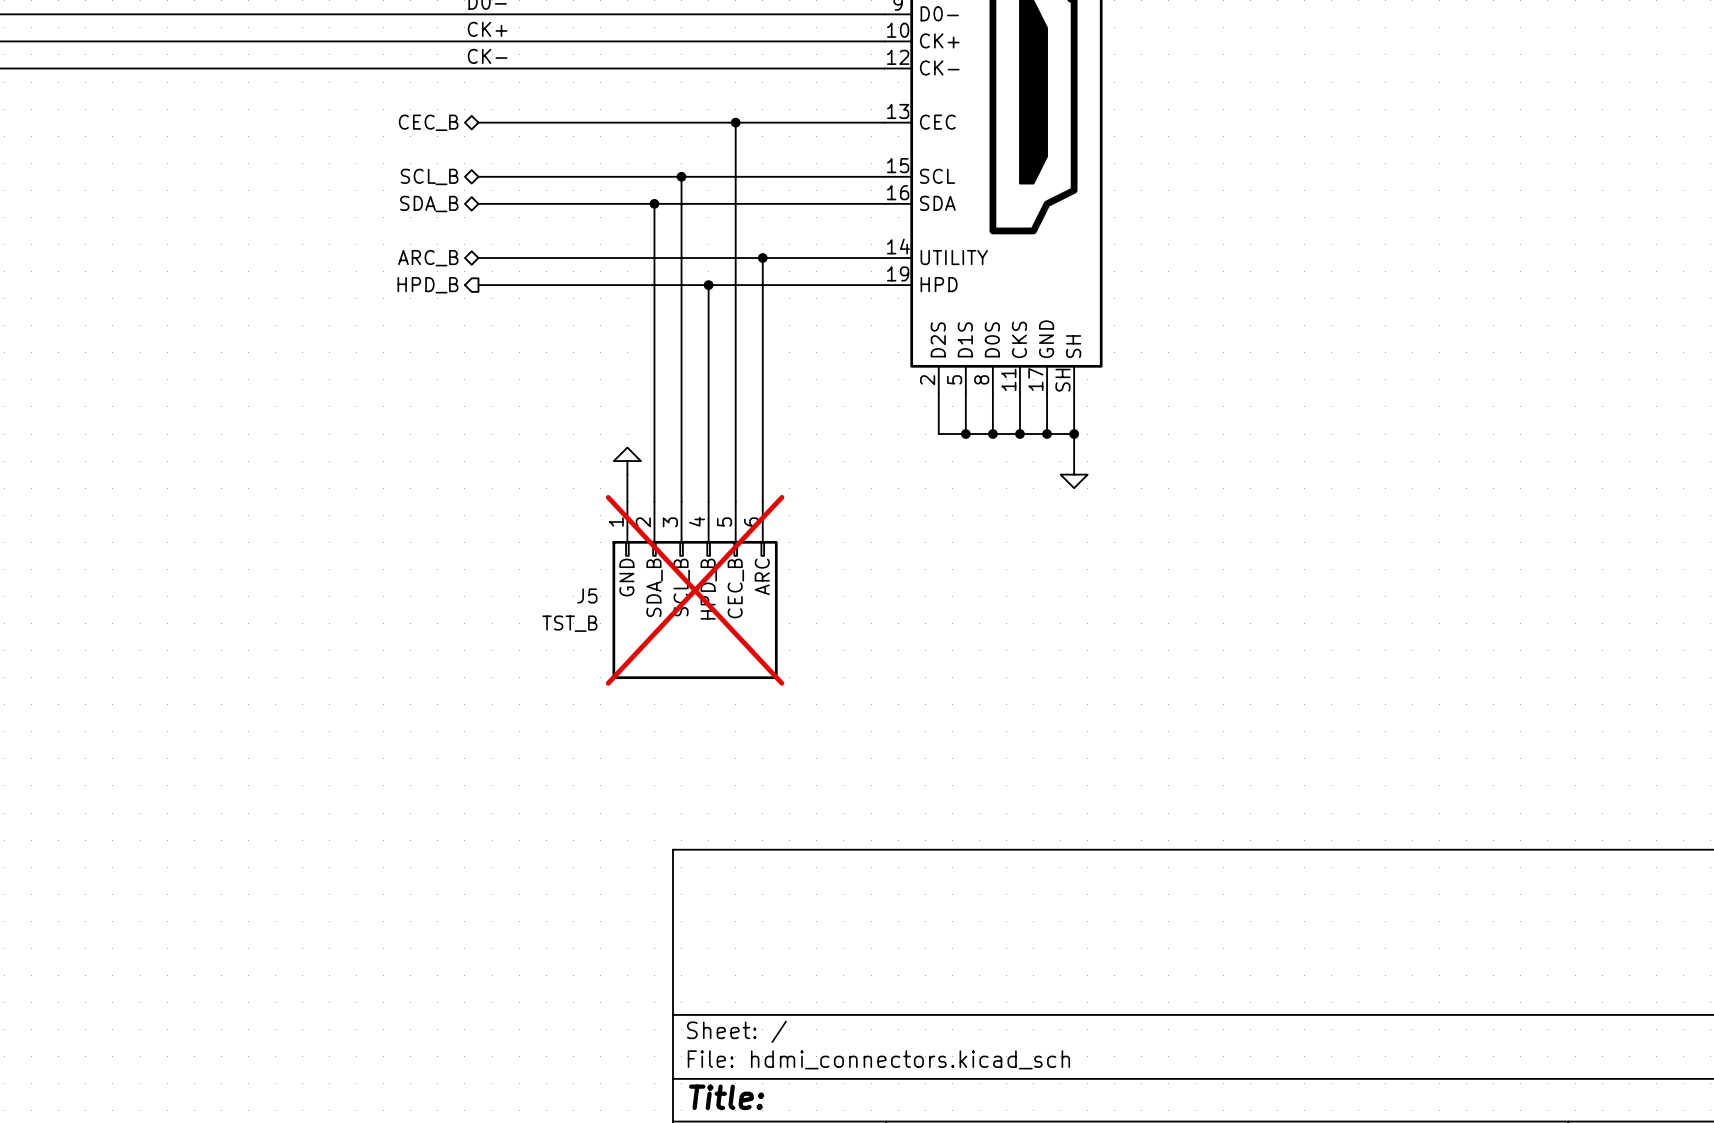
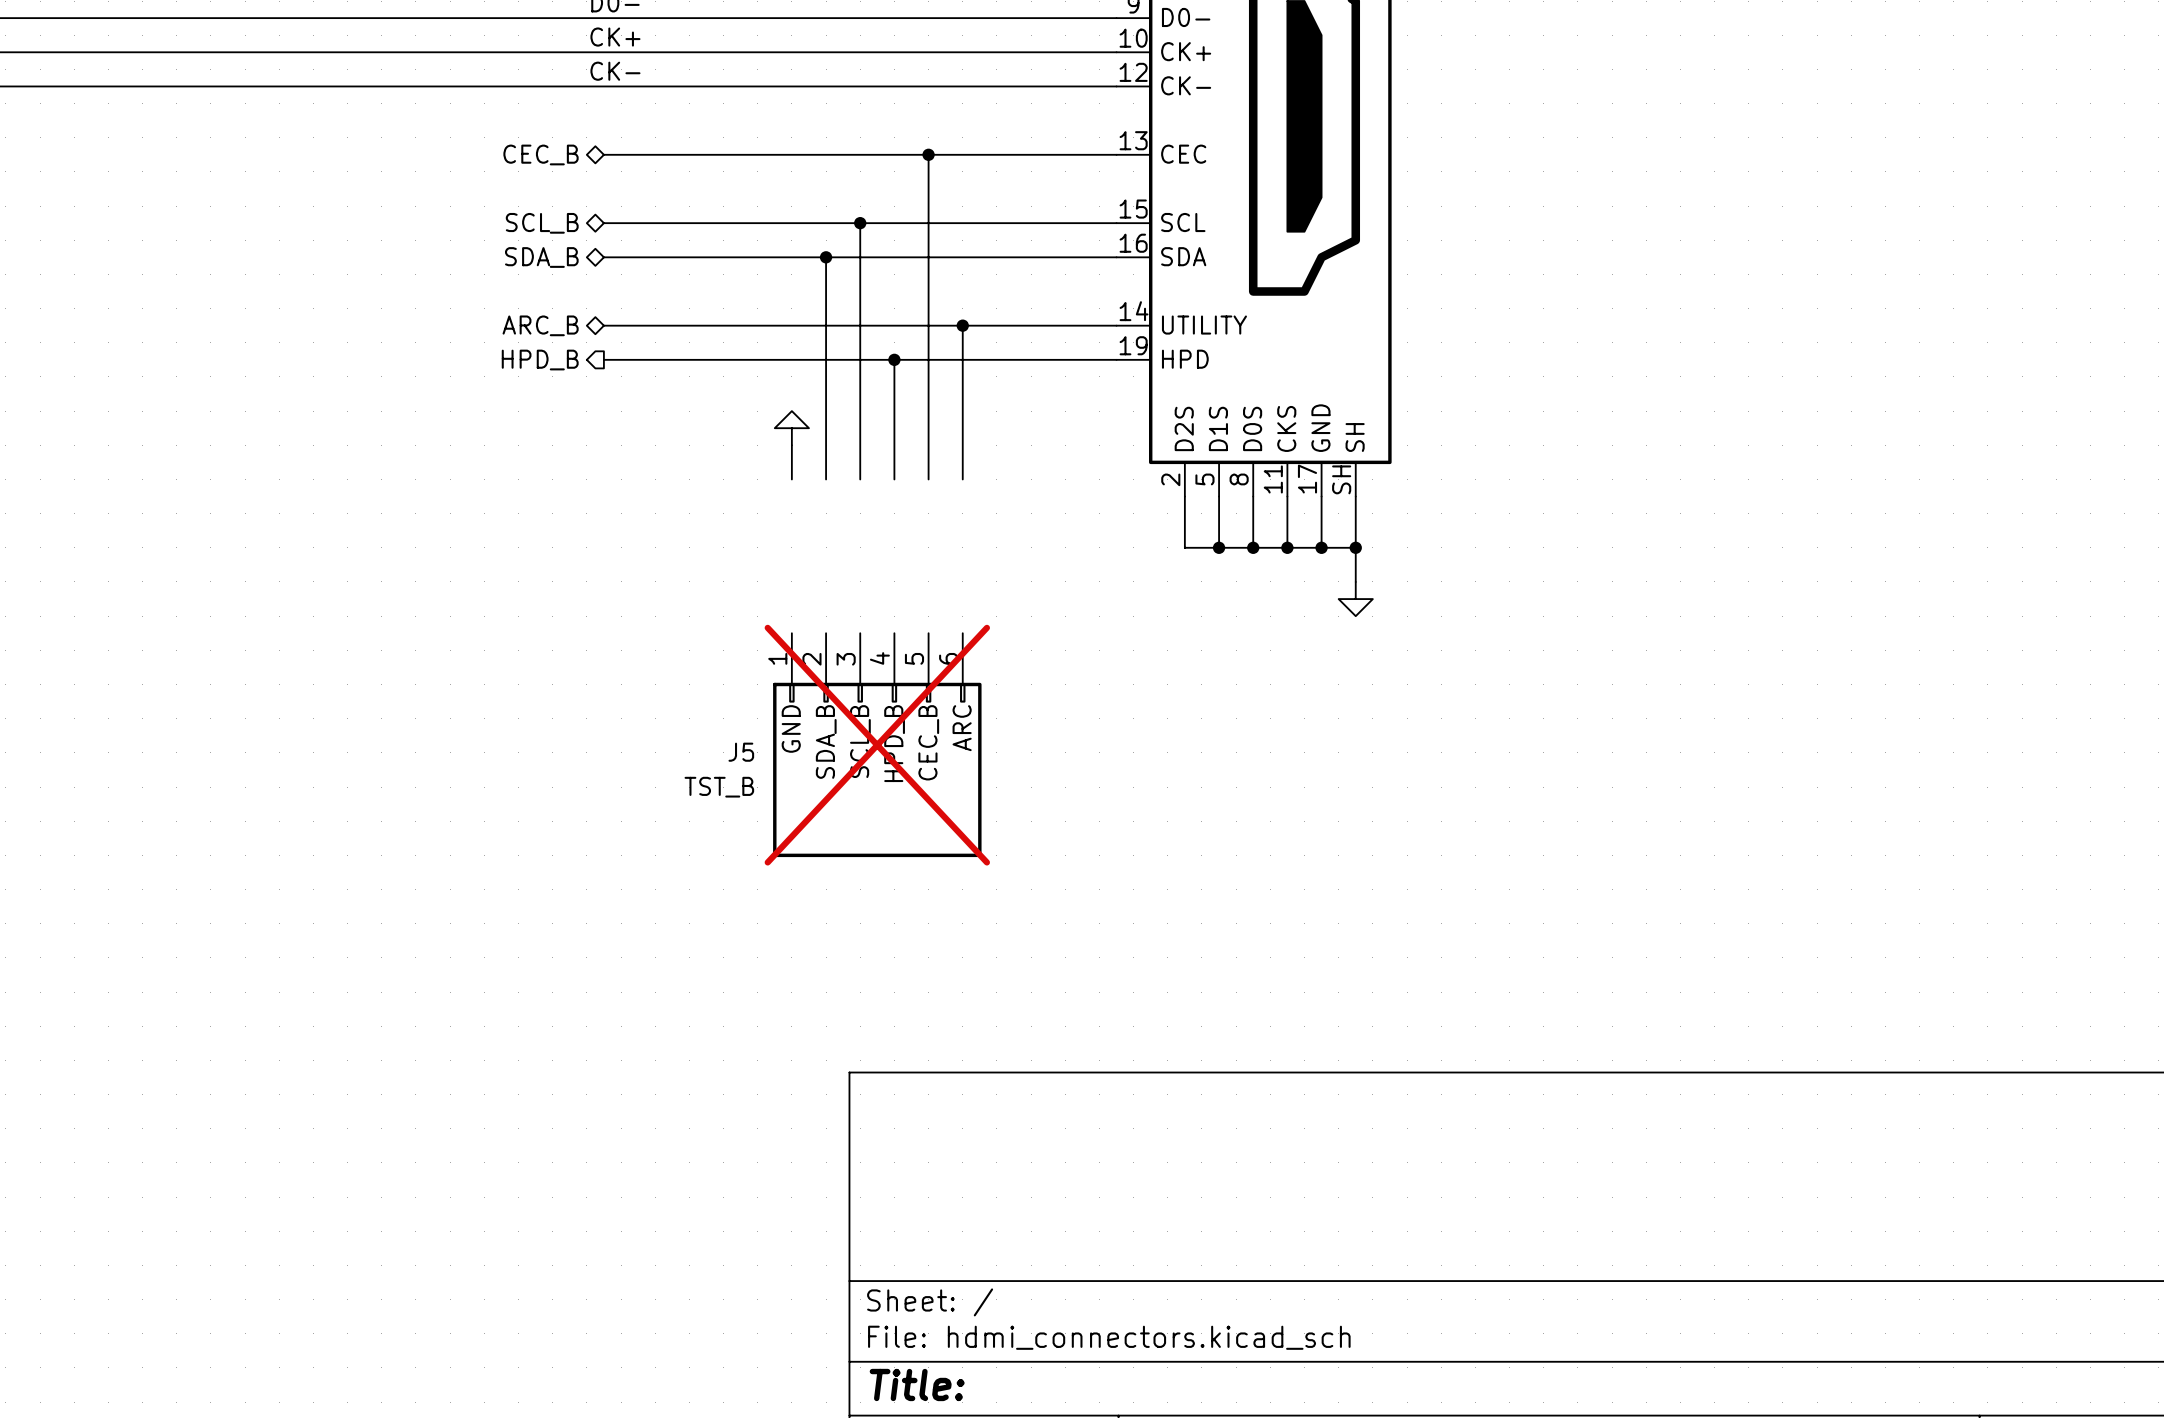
wire: (654, 379) (654, 501) -> none
wire: (681, 379) (681, 501) -> none
wire: (708, 379) (708, 501) -> none
wire: (735, 379) (735, 501) -> none
wire: (762, 379) (762, 501) -> none
power symbol position: (627, 461) -> (791, 428)
wire: (627, 474) (627, 501) -> (791, 445) (791, 479)

